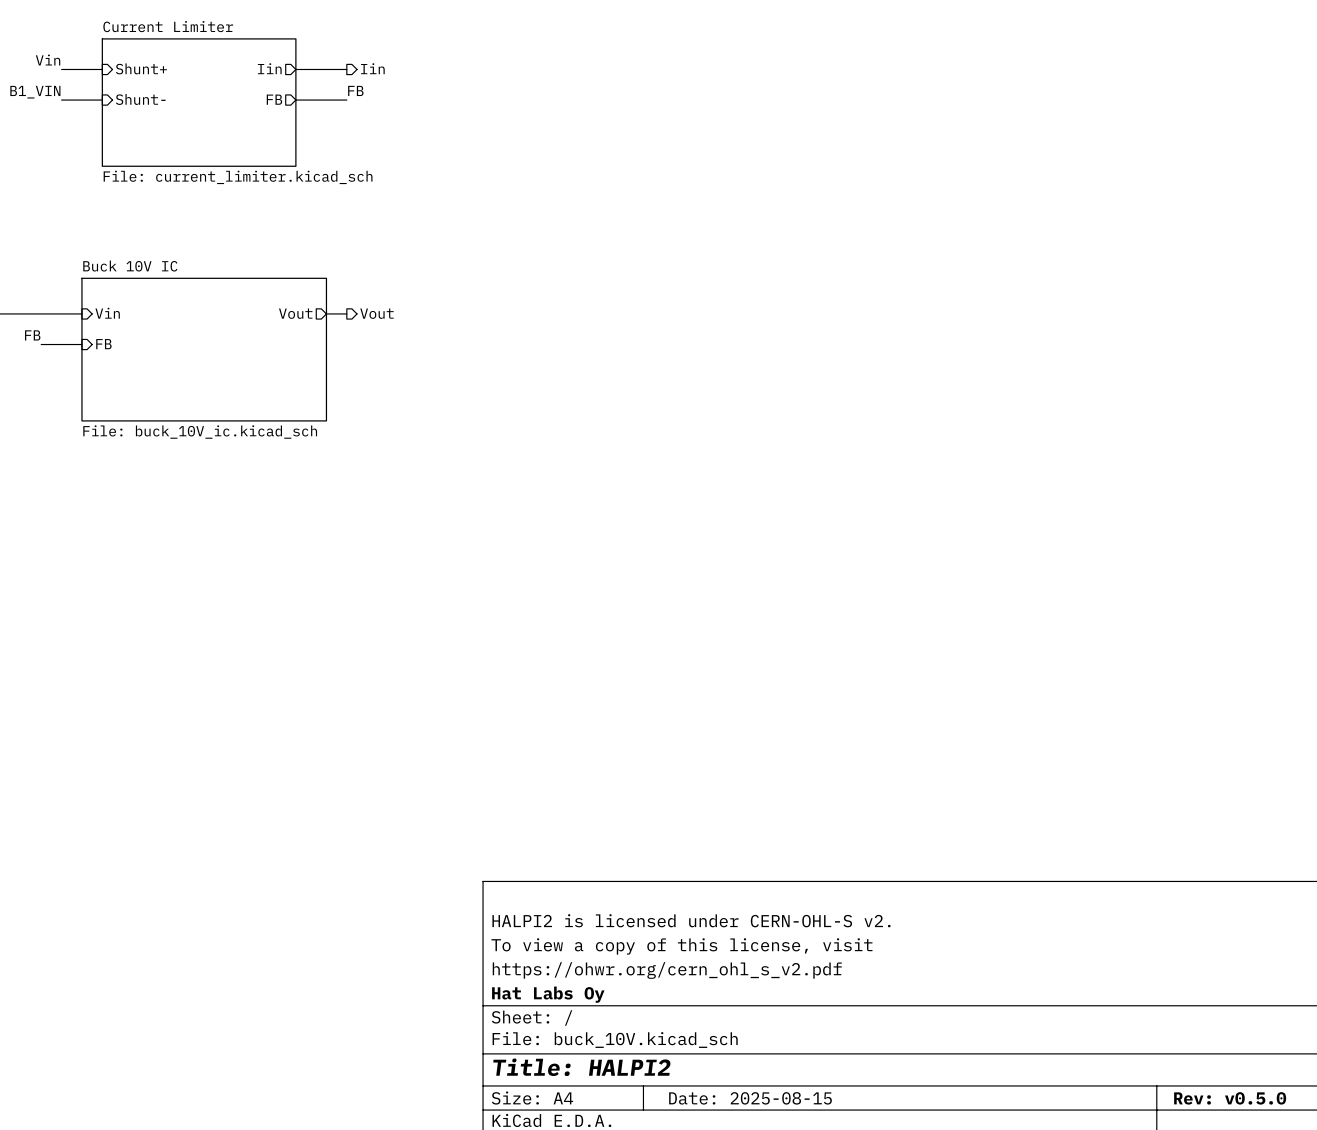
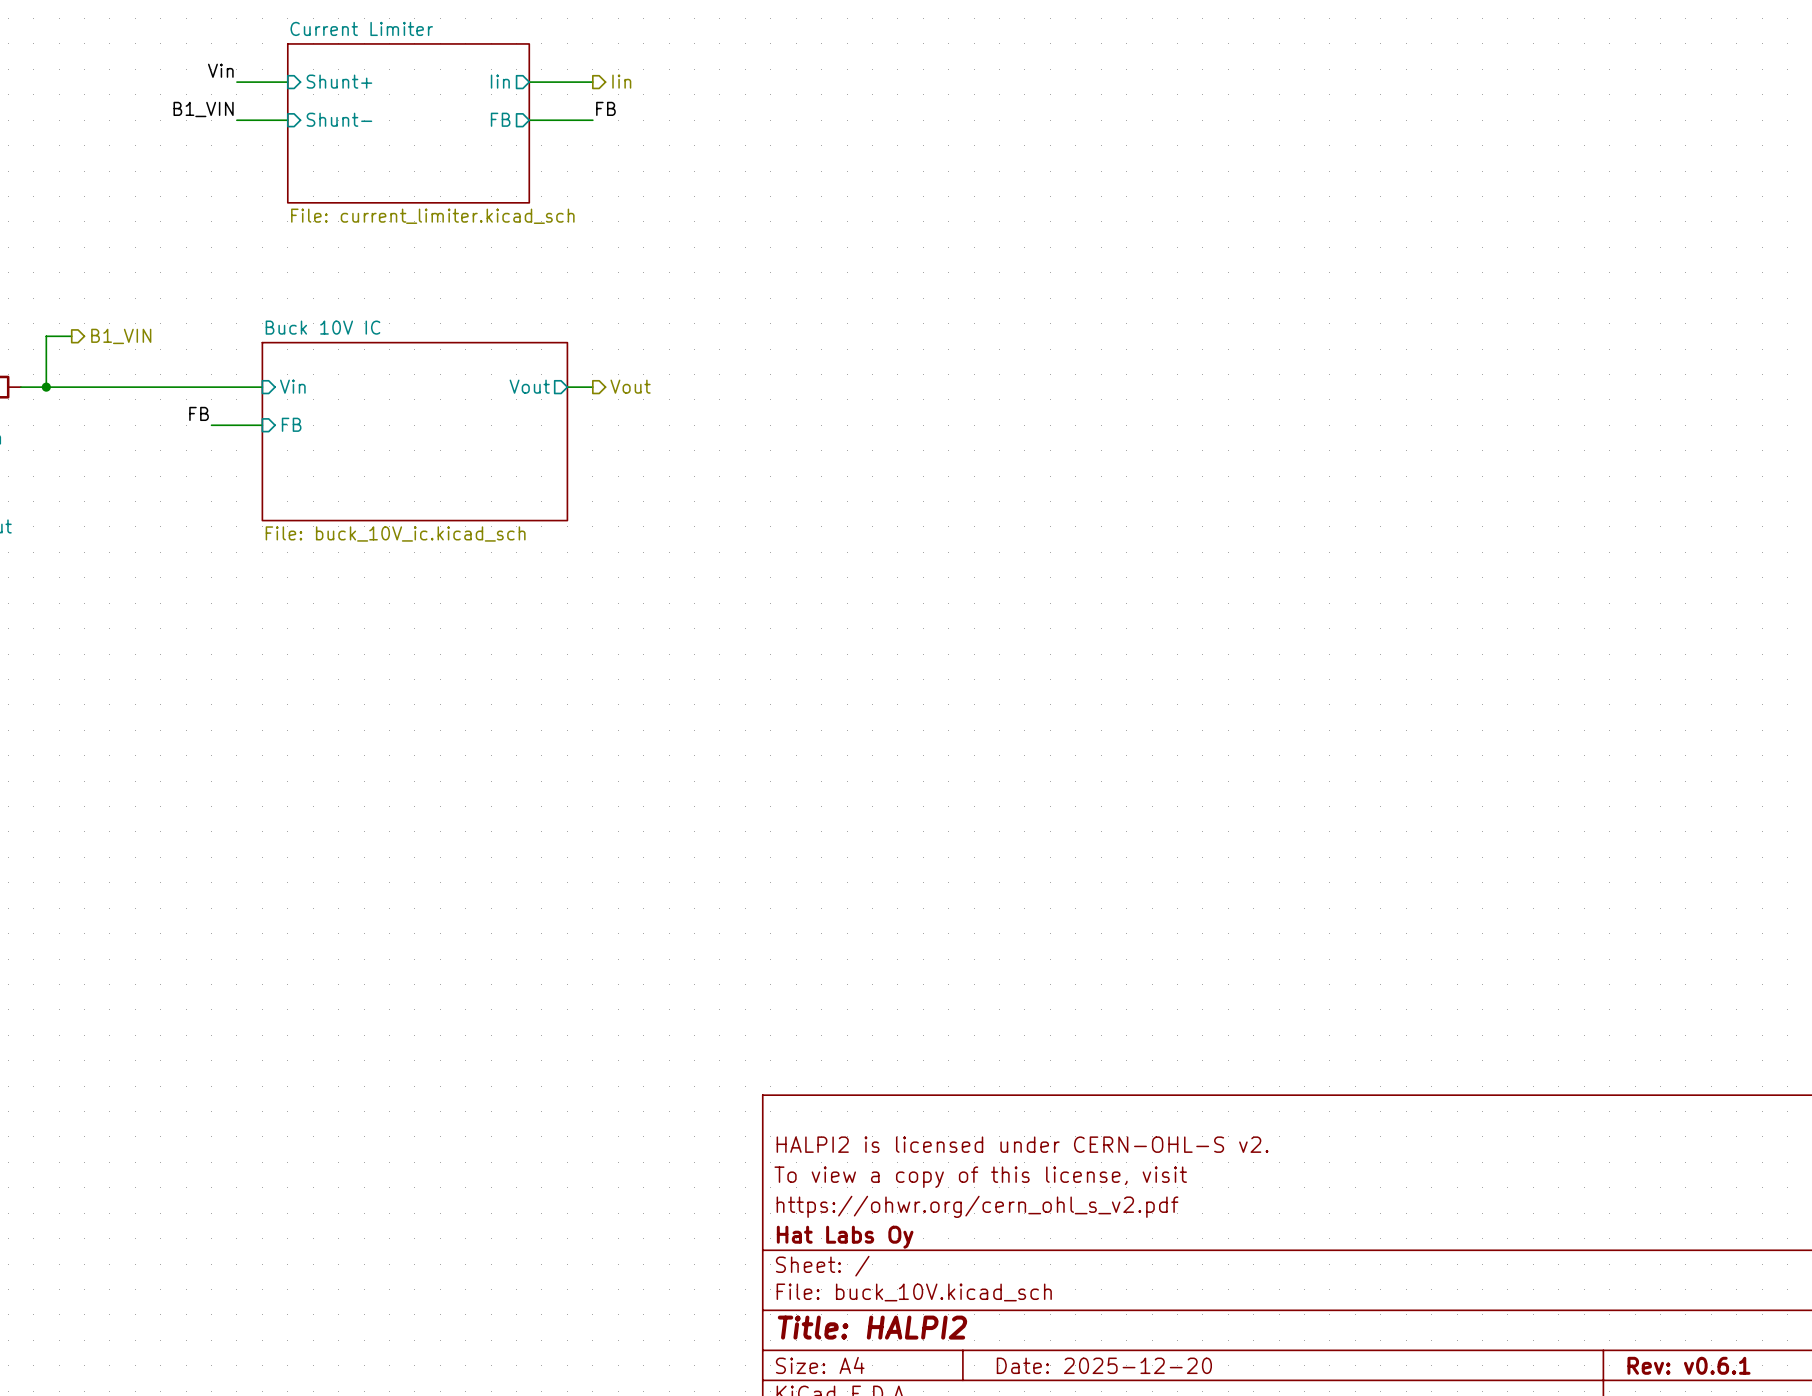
title block: Date: 2025-08-15 (750, 1098) -> Date: 2025-12-20 (1104, 1365)
title block: Rev: v0.5.0 (1230, 1098) -> Rev: v0.6.1 (1689, 1365)

